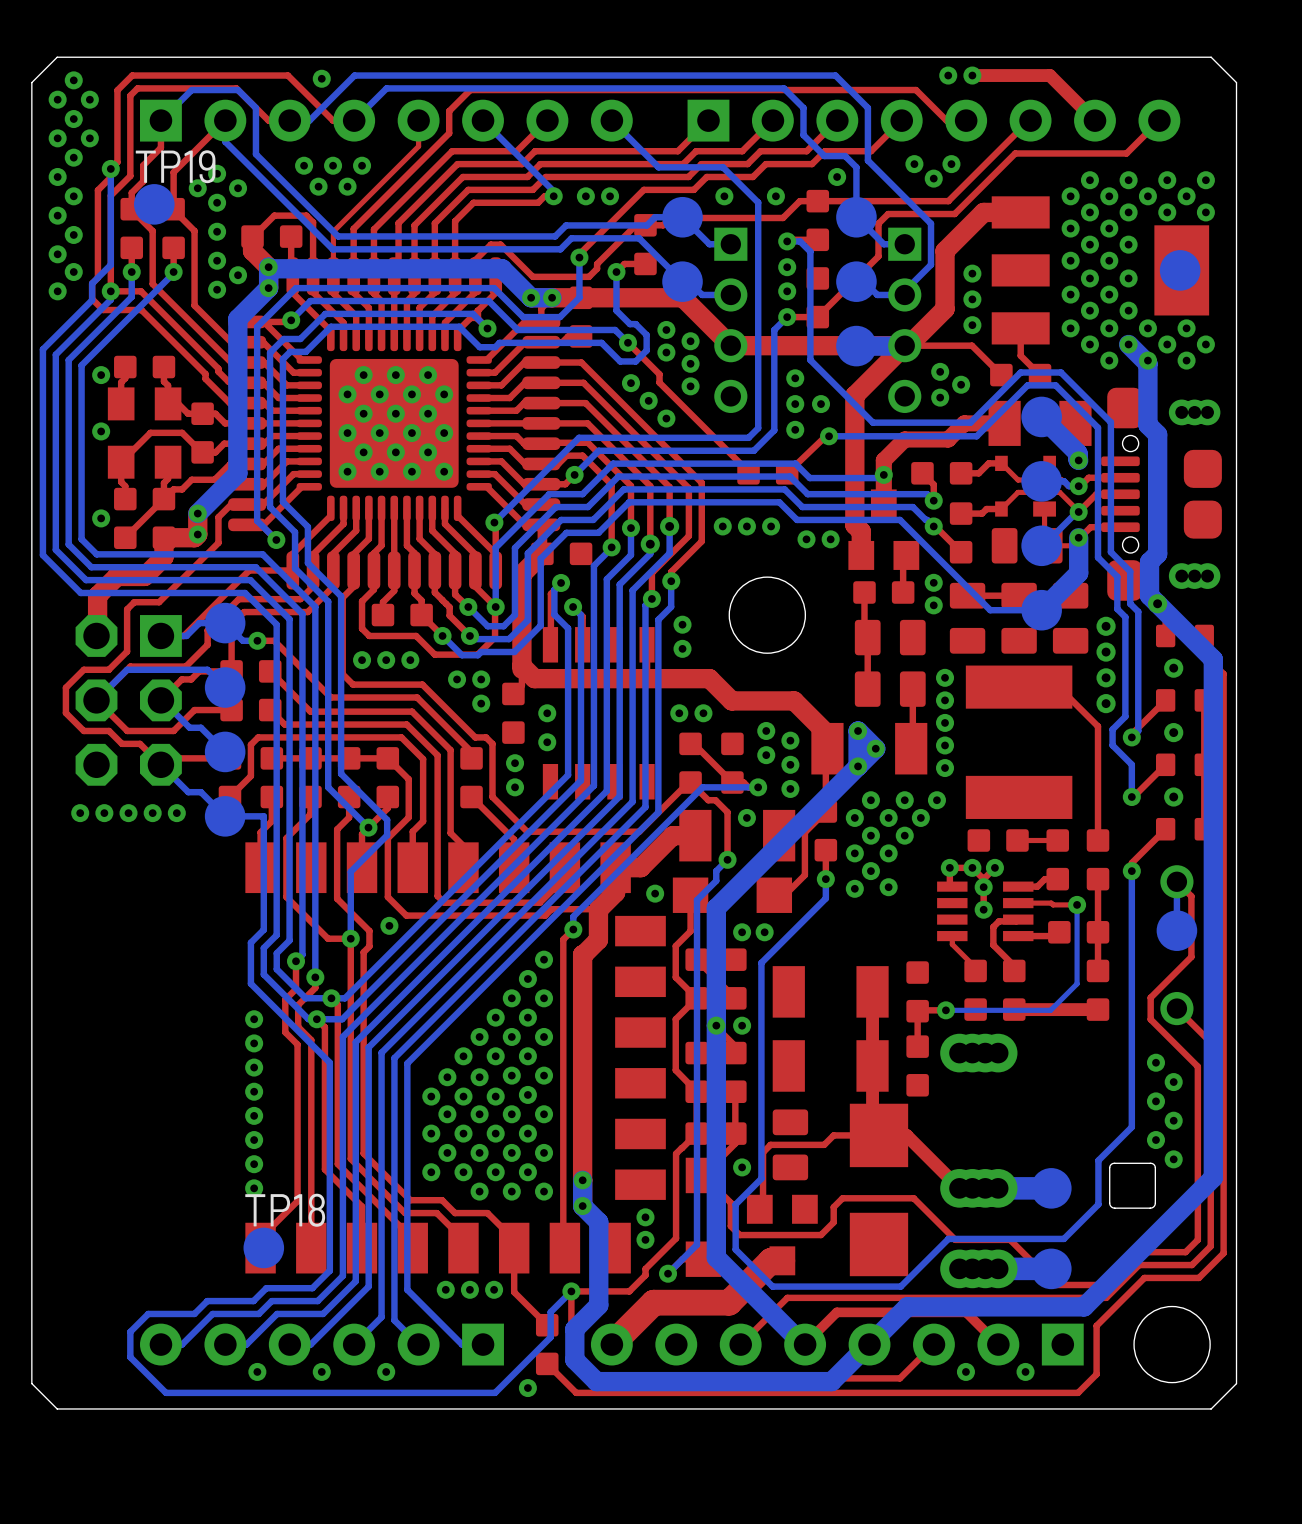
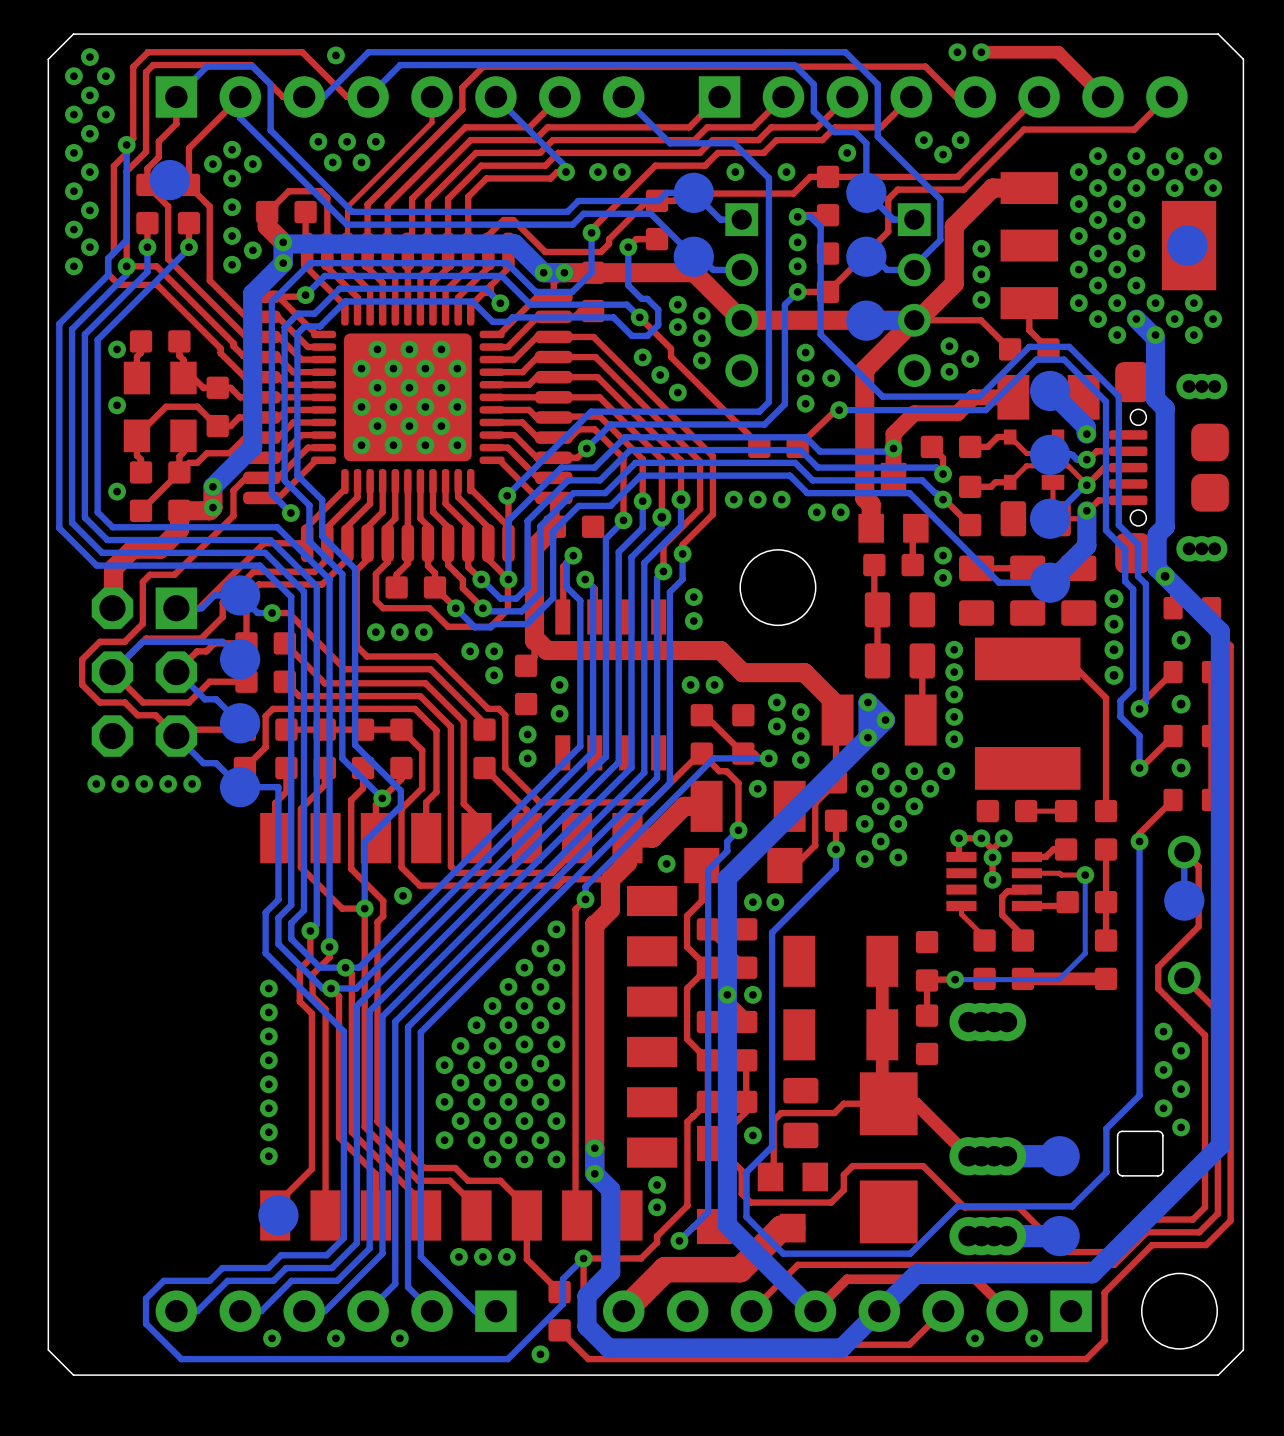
TP19 name: TP19 (175, 166) -> none
TP18 name: TP18 (285, 1210) -> none

